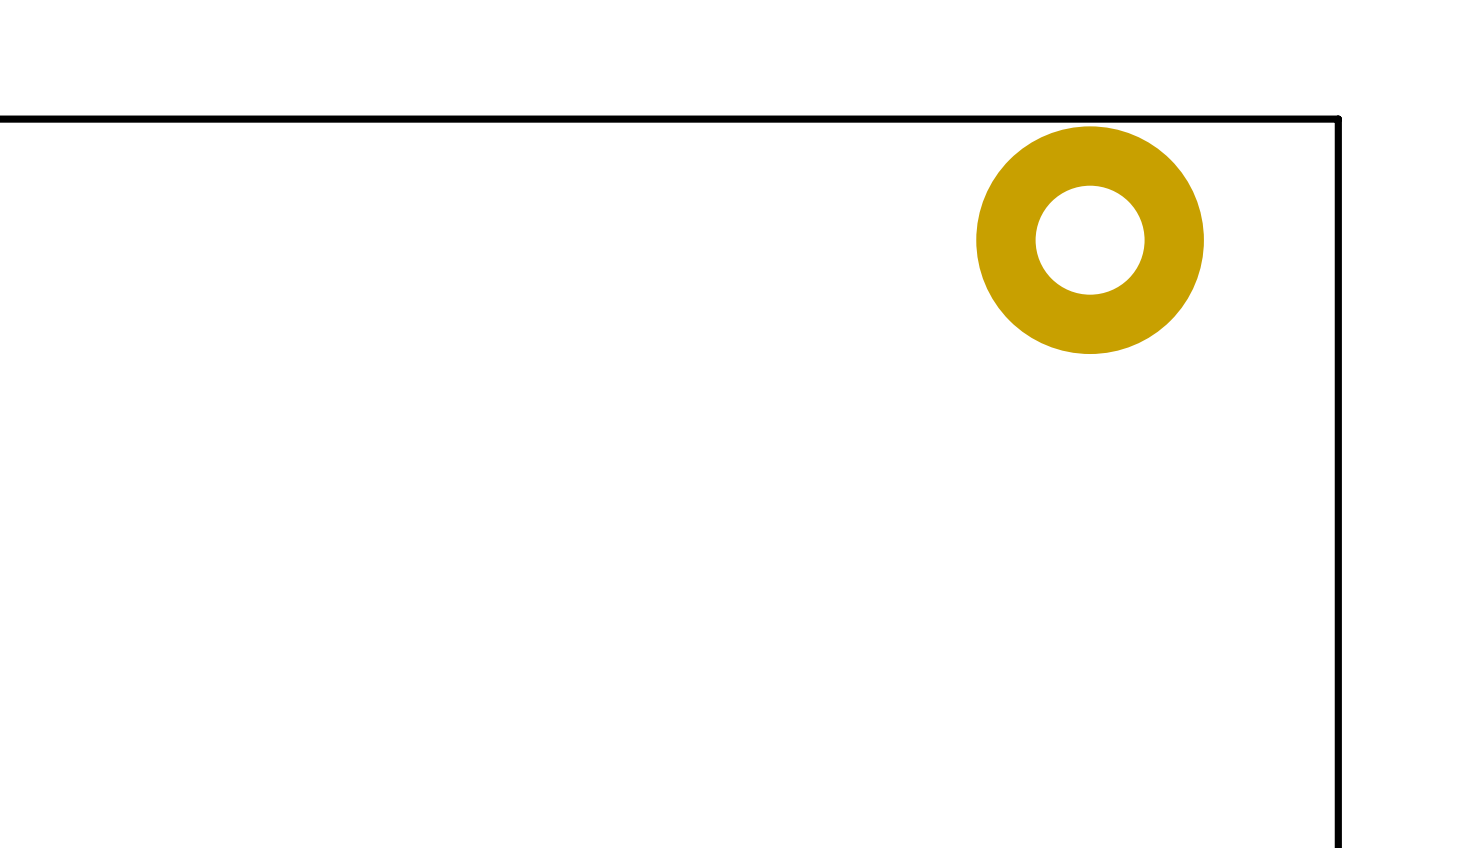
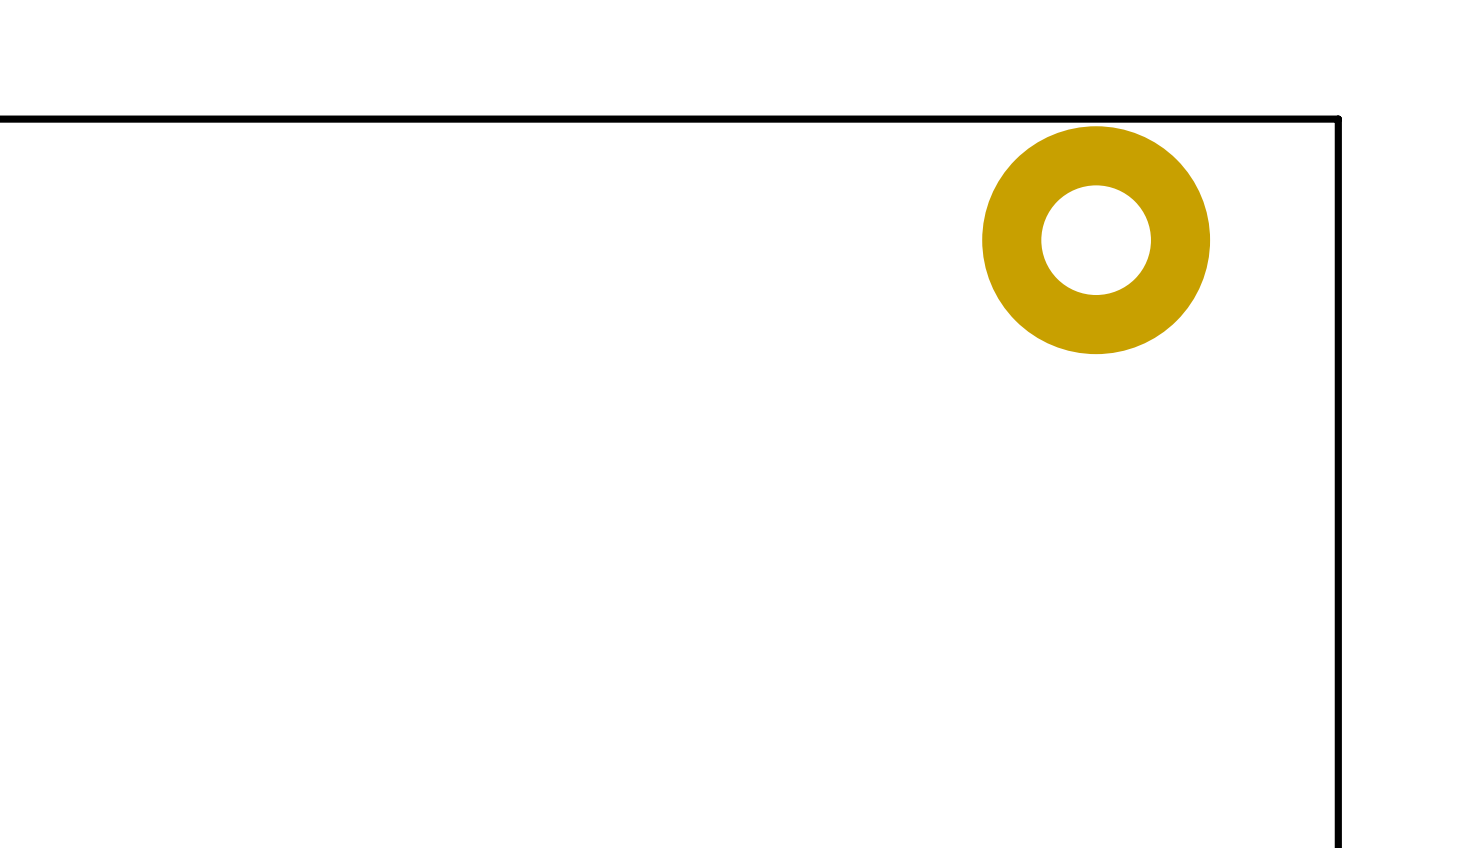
part footprint: [976, 126, 1204, 355] -> [982, 126, 1211, 355]

